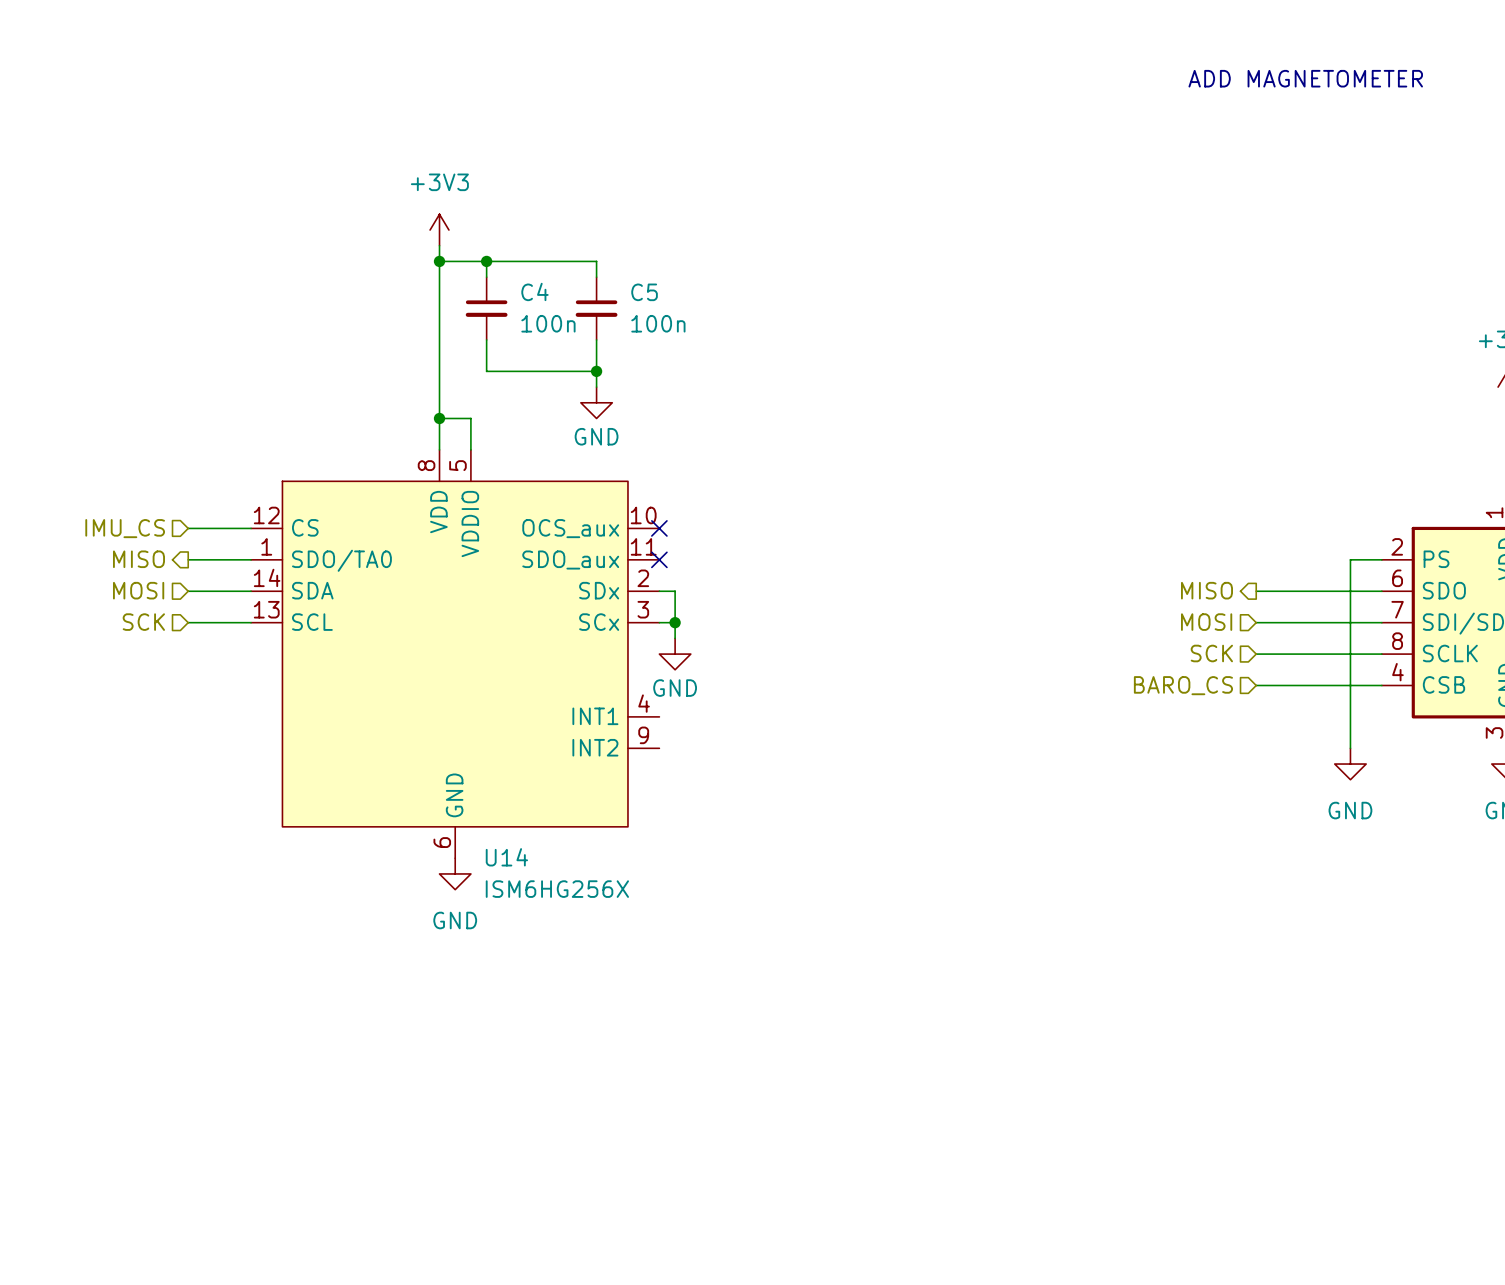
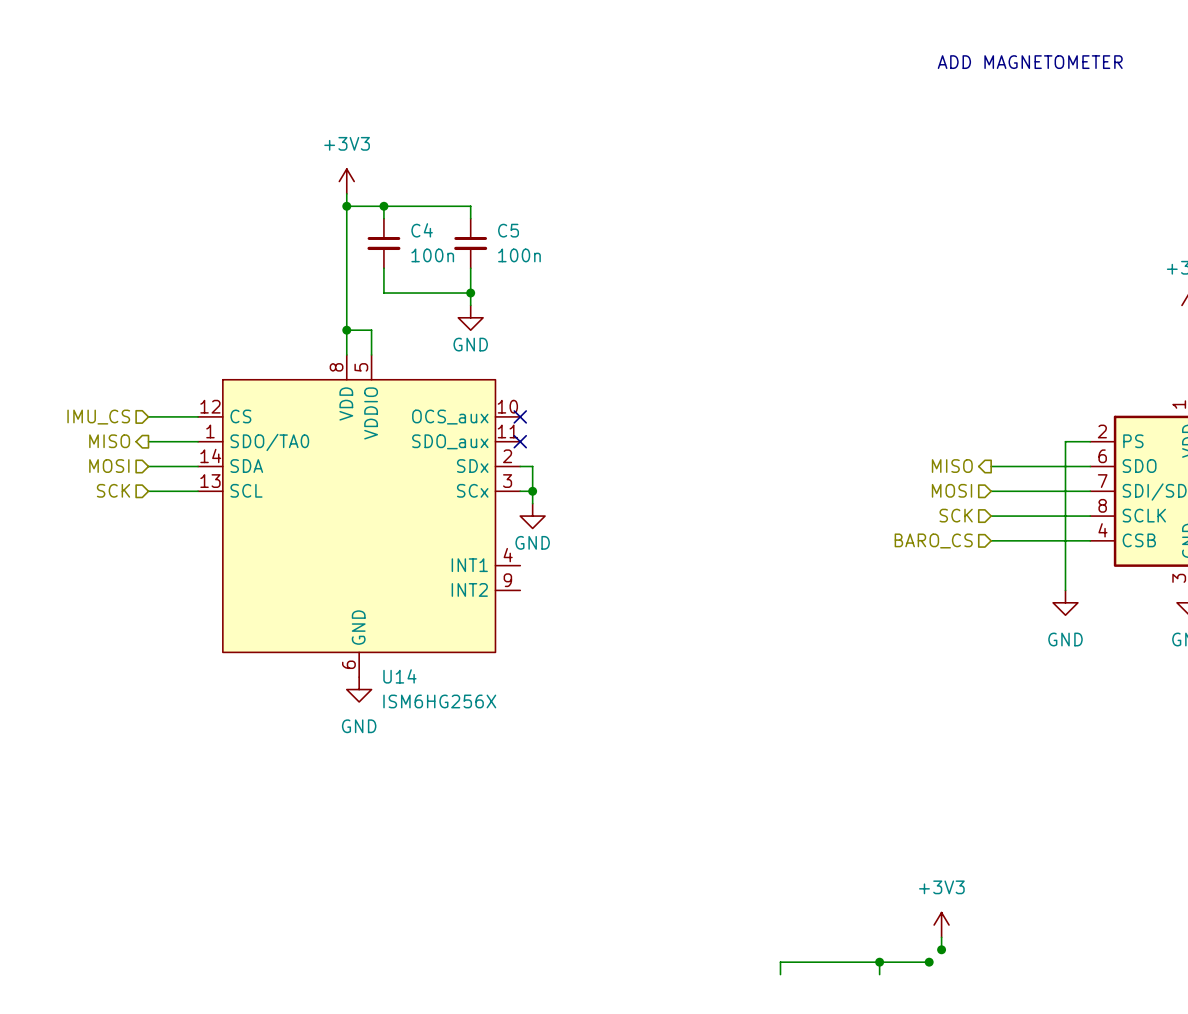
power symbol: none -> +3V3 (941, 925)
wire: none -> (941, 937) (941, 949)
junction: none -> (941, 949)
wire: none -> (879, 962) (879, 974)
junction: none -> (879, 962)
wire: none -> (929, 962) (780, 962) (780, 974)
junction: none -> (929, 962)

